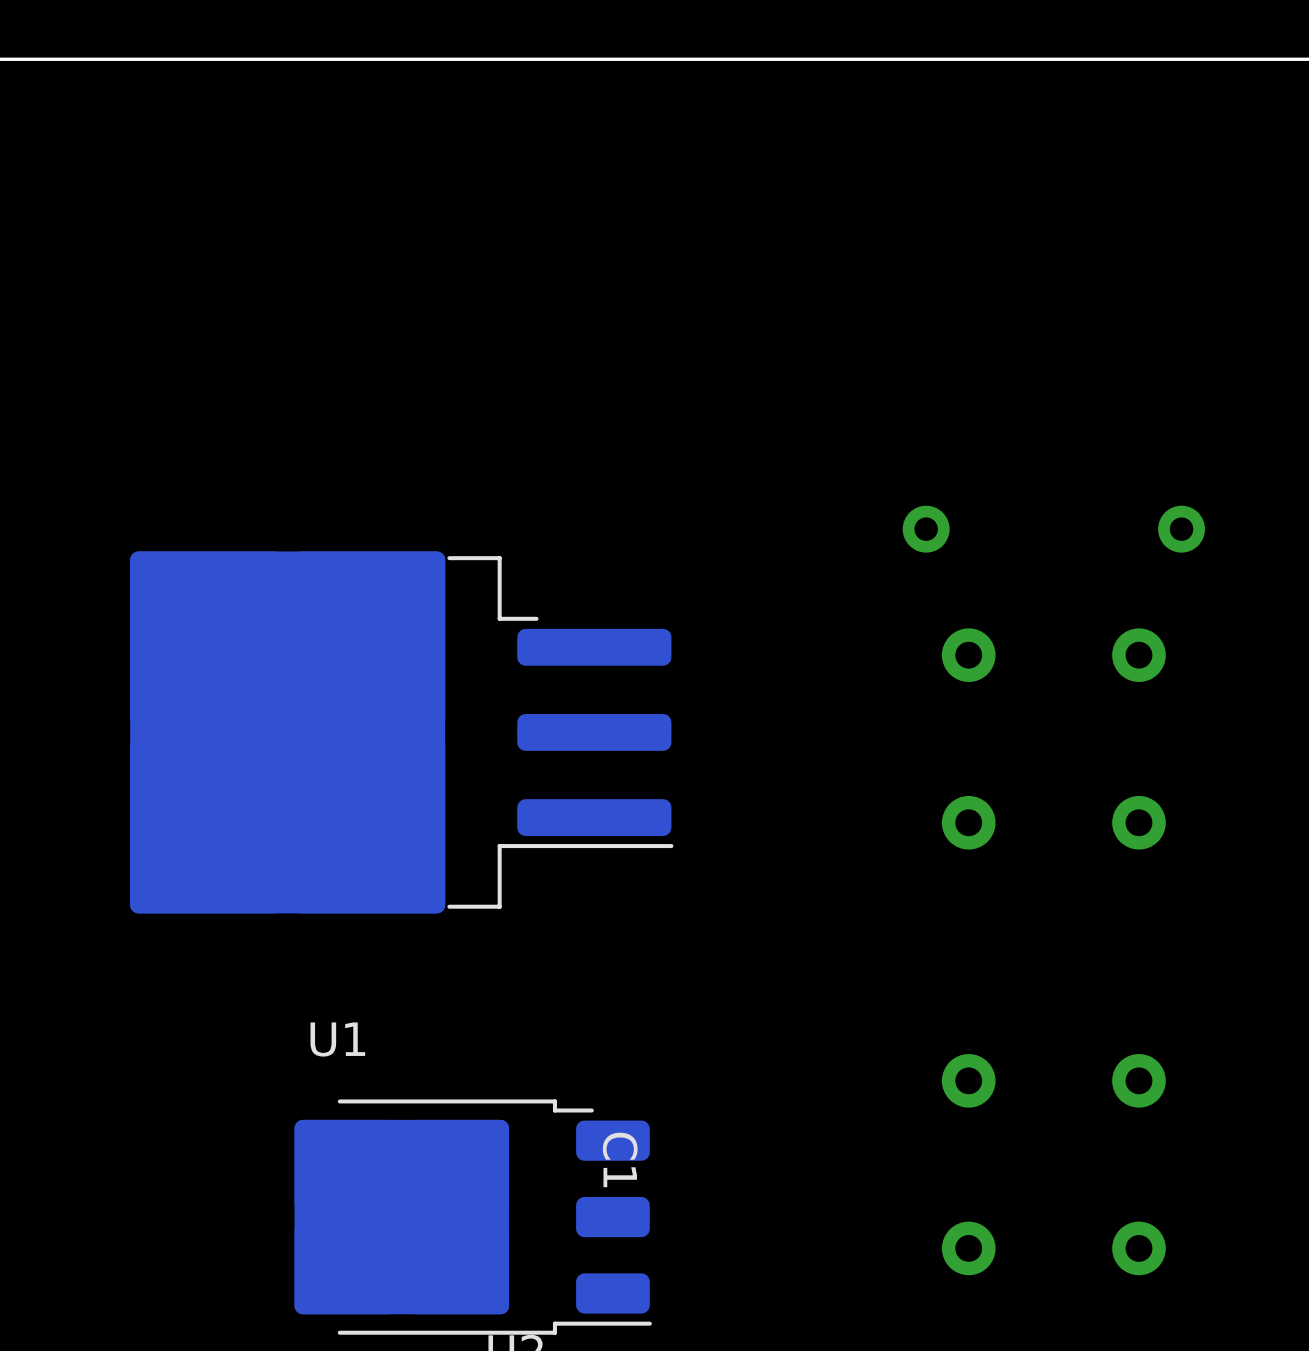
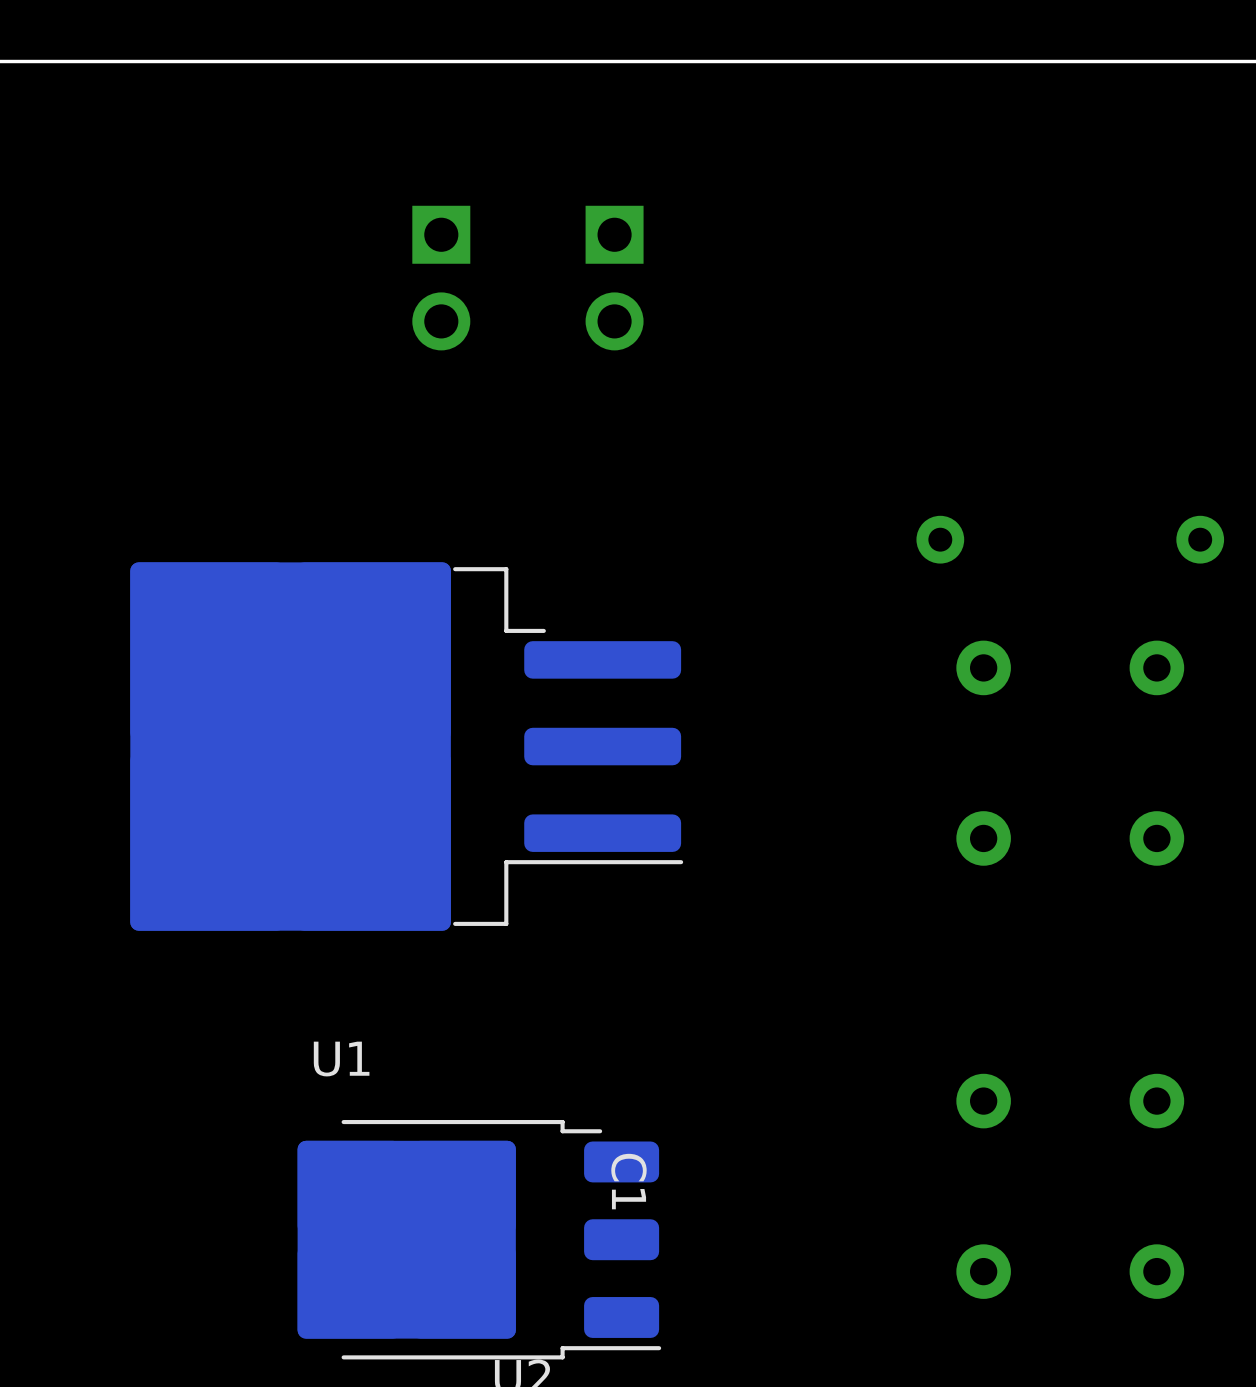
part: none -> (441, 278)
part: none -> (614, 278)

